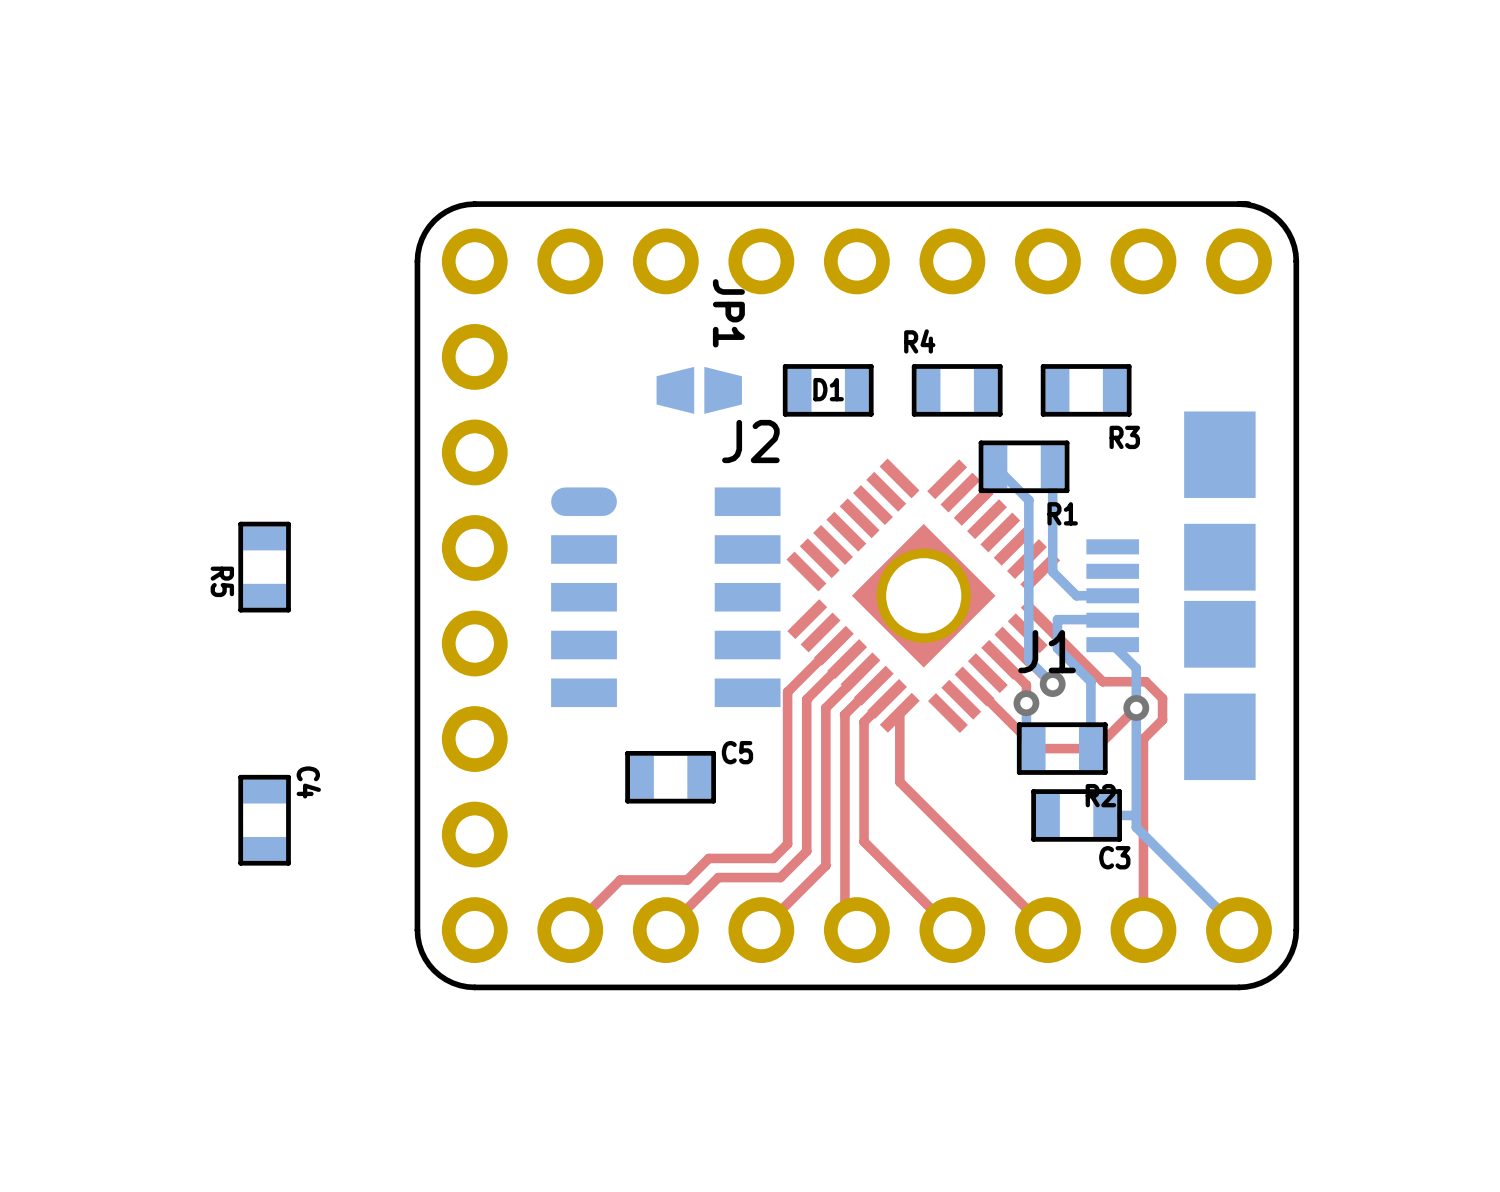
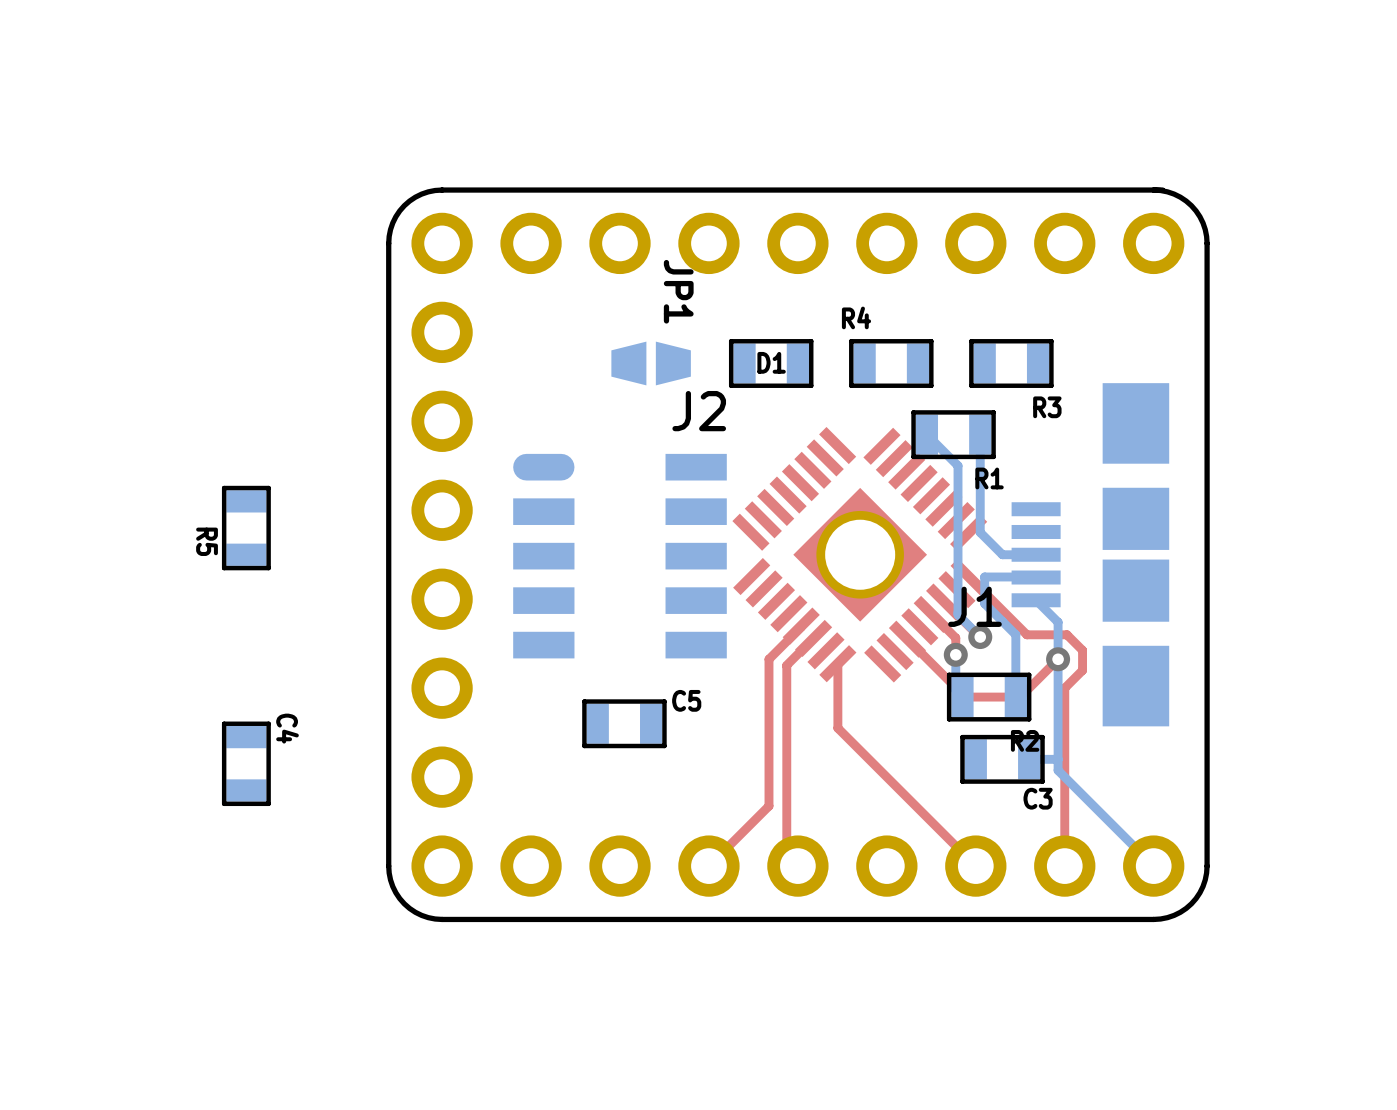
top track: (833, 645) (787, 691) (787, 844) (773, 858) (708, 858) (687, 879) (620, 879) (570, 930) -> none
top track: (847, 659) (806, 699) (806, 851) (780, 877) (718, 877) (665, 930) -> none
top track: (887, 698) (864, 721) (864, 841) (952, 930) -> none

